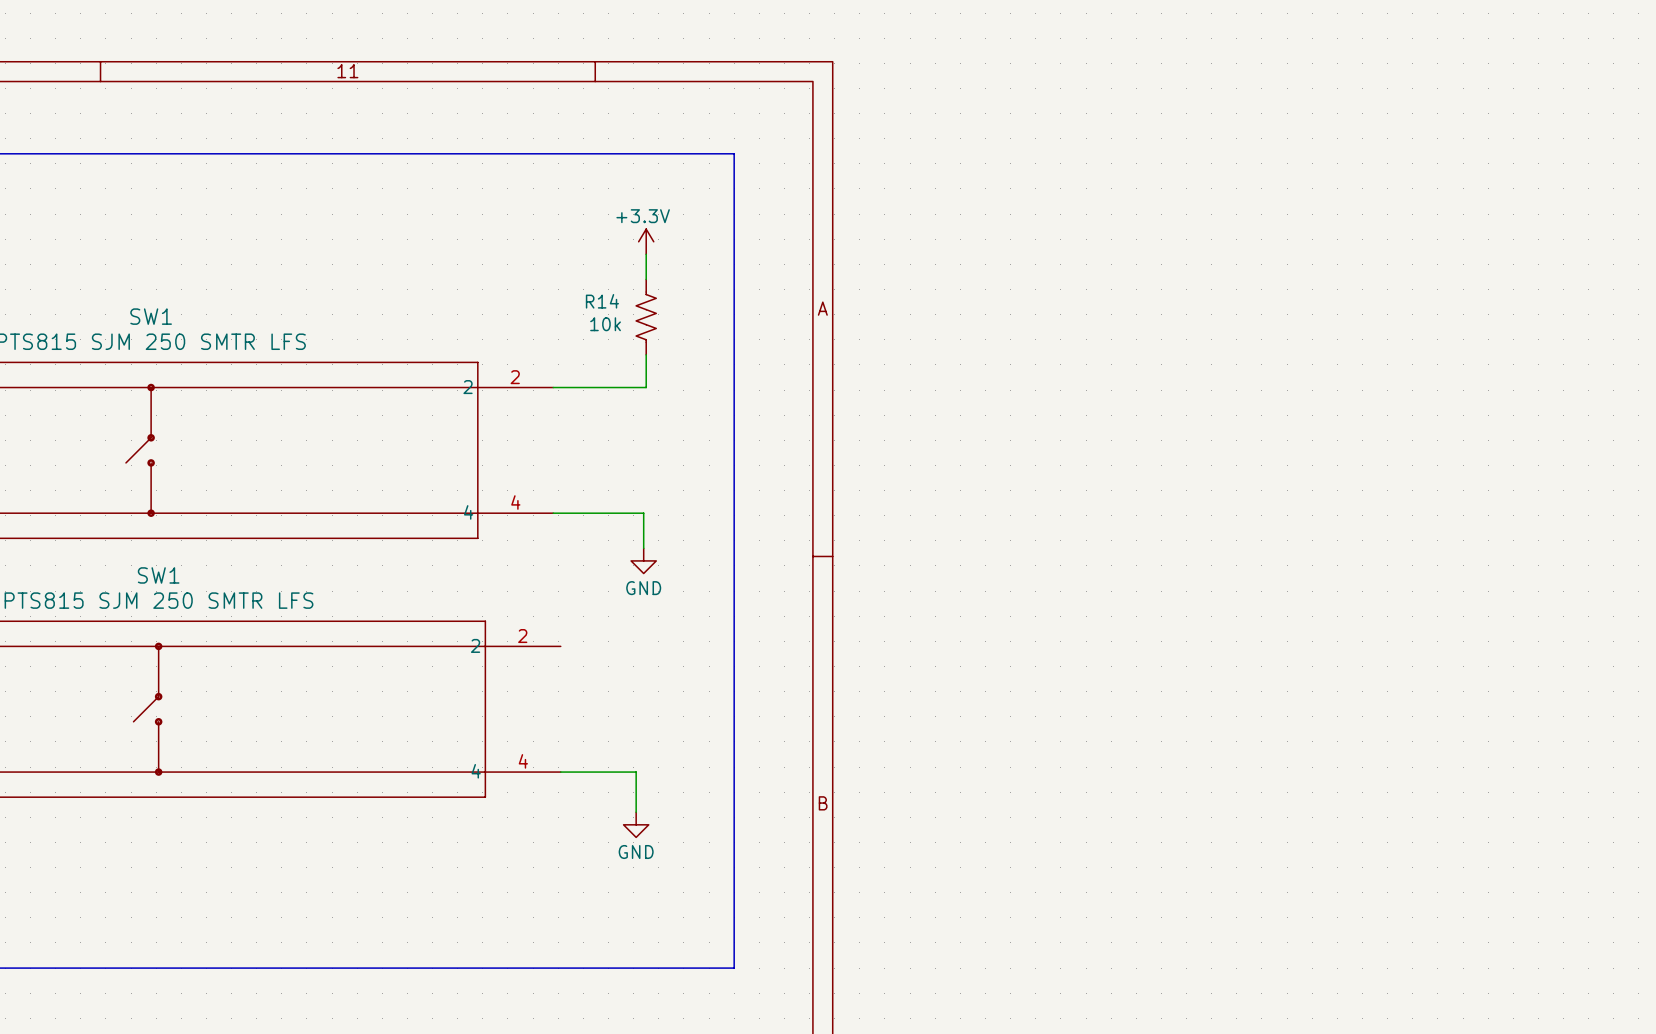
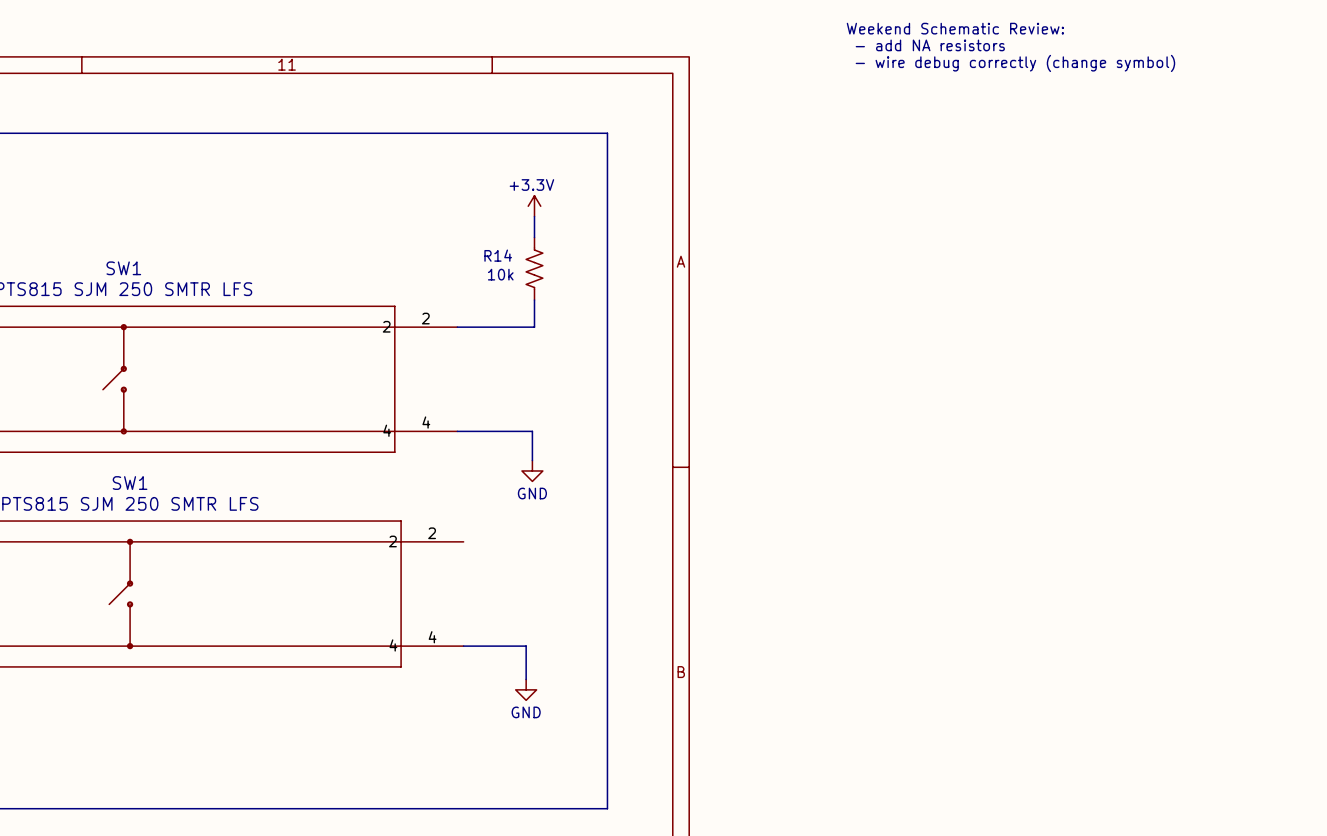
text: none -> Weekend Schematic Review: (955, 28)
text: none -> - add NA resistors (930, 45)
text: none -> - wire debug correctly (change symbol) (1015, 63)

